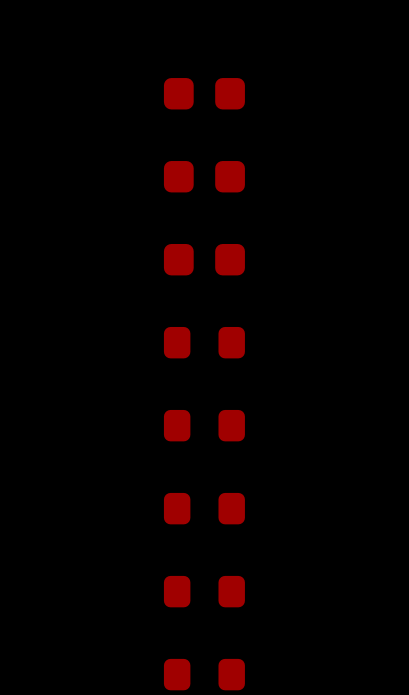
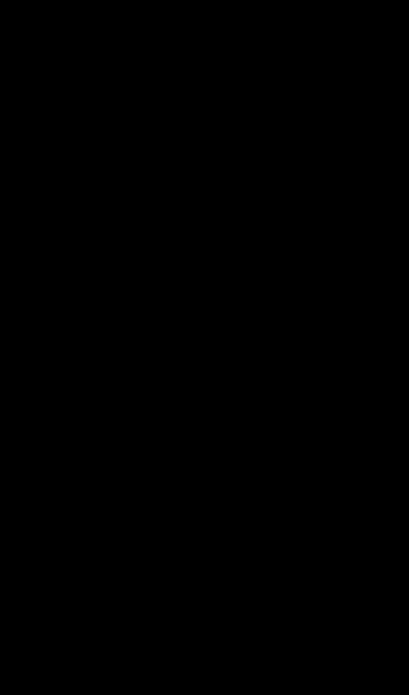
part: (204, 93) -> none
part: (204, 176) -> none
part: (204, 259) -> none
part: (204, 342) -> none
part: (204, 425) -> none
part: (204, 508) -> none
part: (204, 591) -> none
part: (204, 674) -> none

